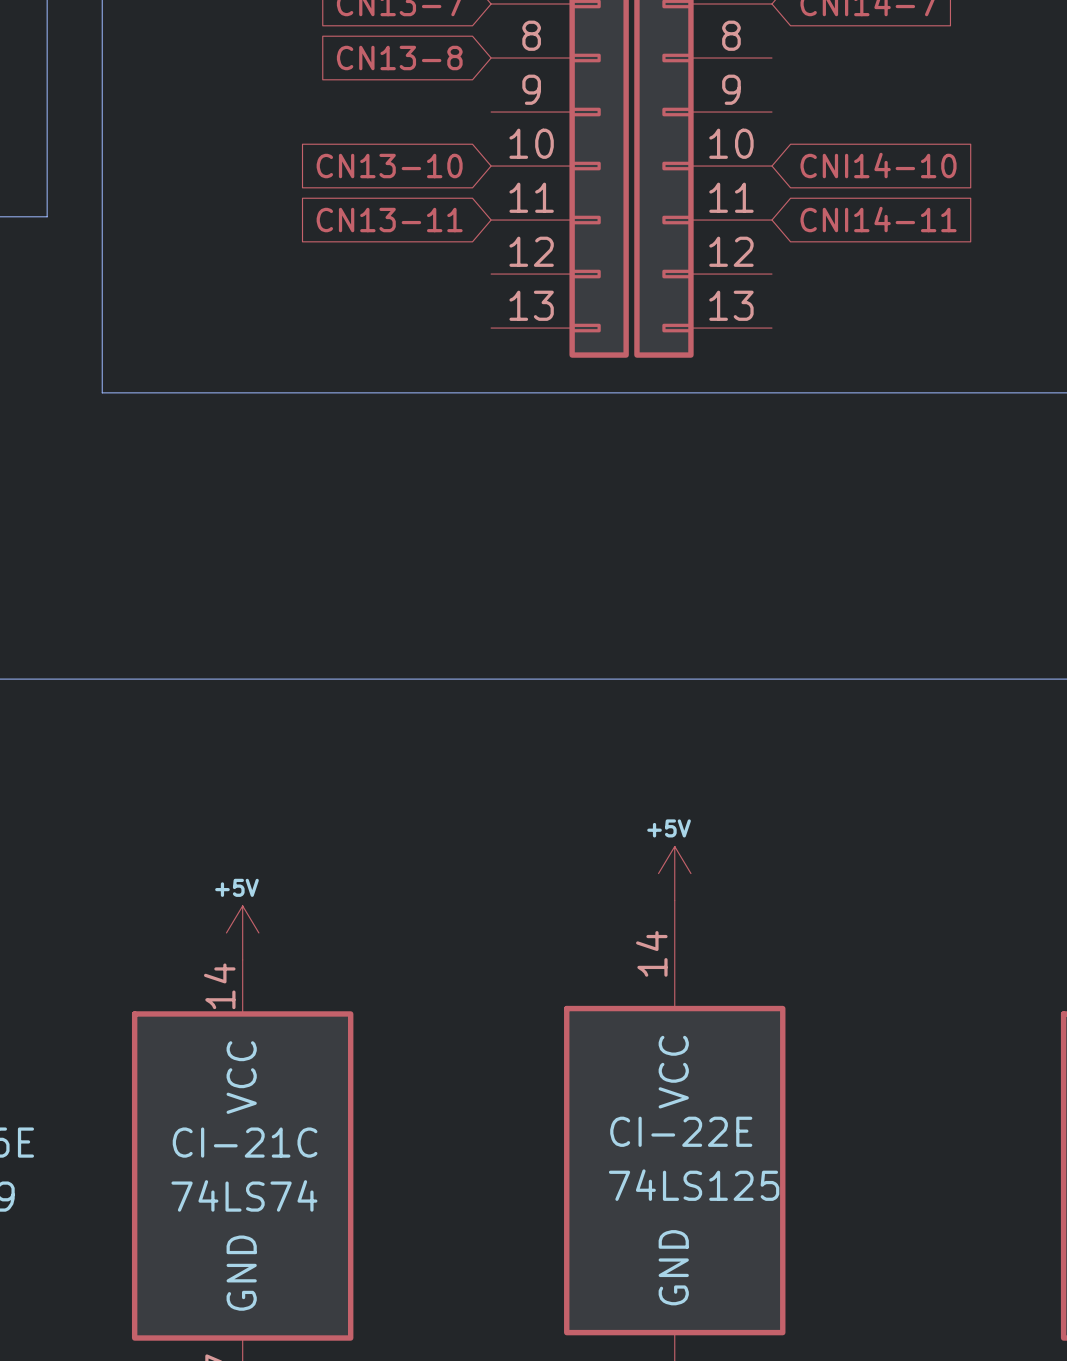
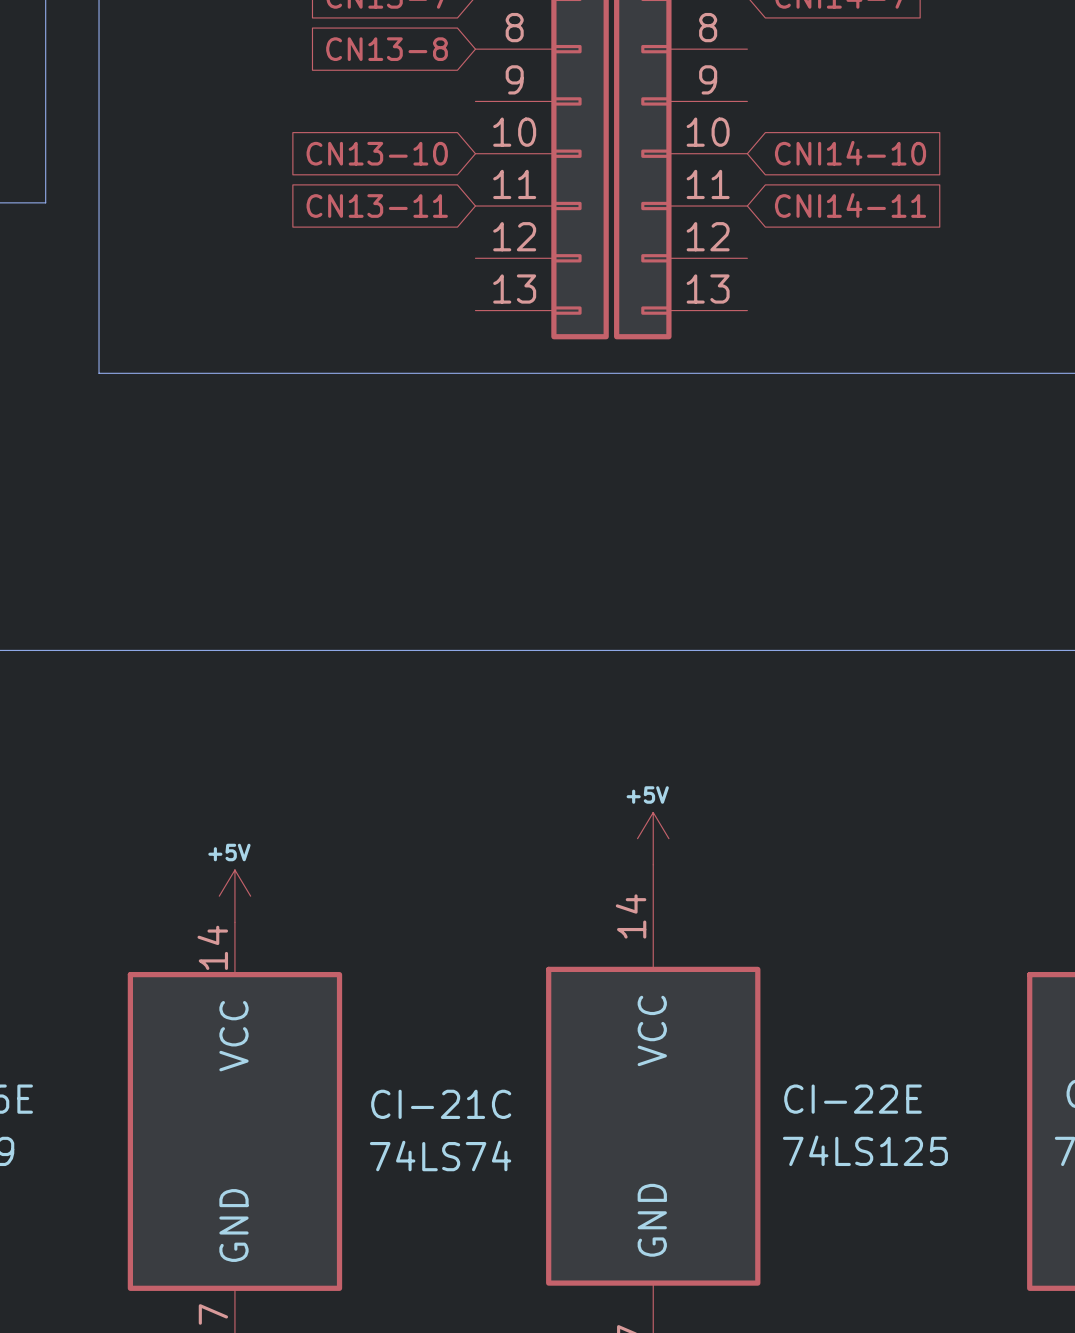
CI-22E name position: CI-22E (681, 1131) -> CI-22E (853, 1099)
CI-21C name position: CI-21C (245, 1142) -> CI-21C (441, 1104)
CI-22E value position: 74LS125 (694, 1185) -> 74LS125 (865, 1150)
CI-21C value position: 74LS74 (244, 1195) -> 74LS74 (440, 1156)

